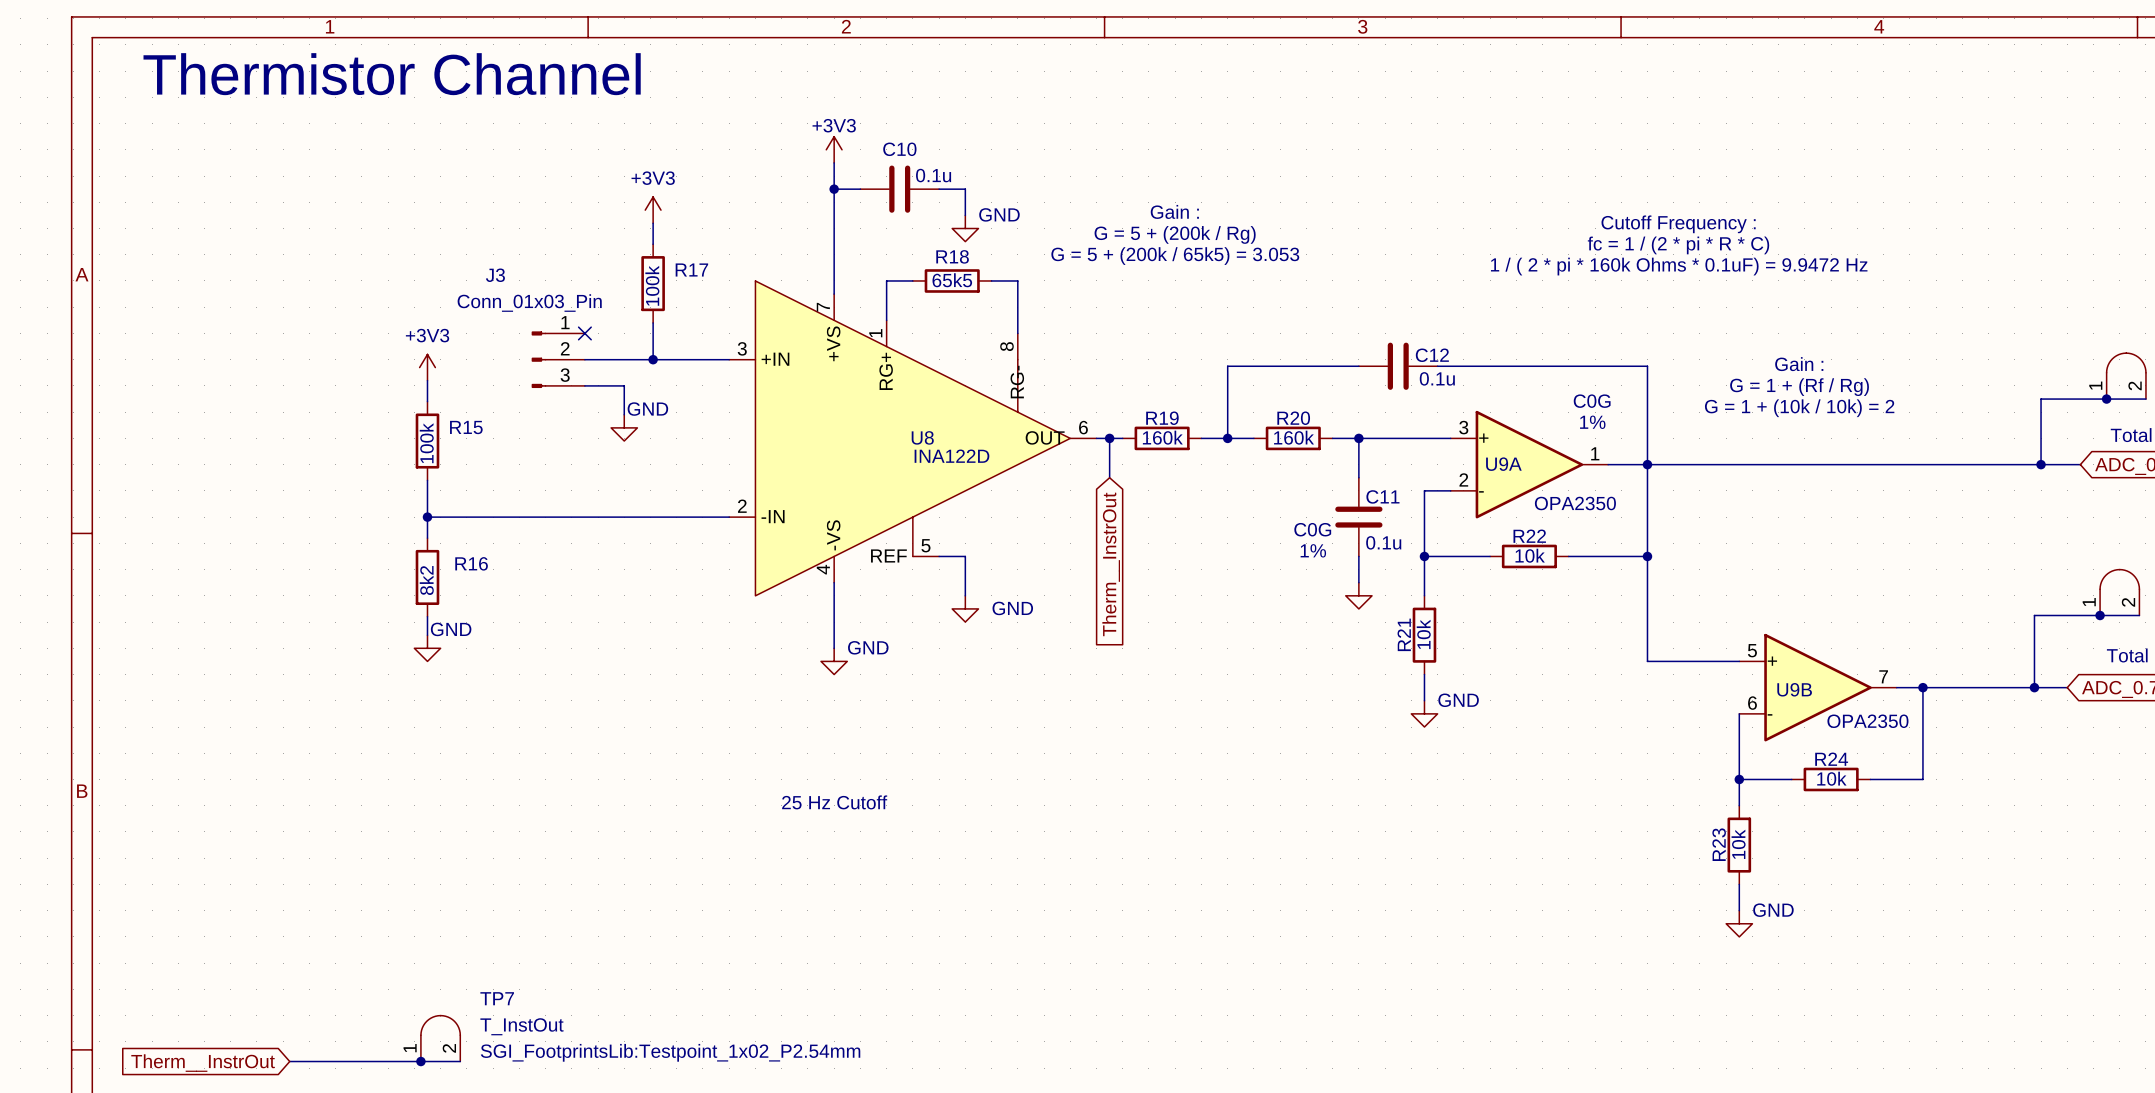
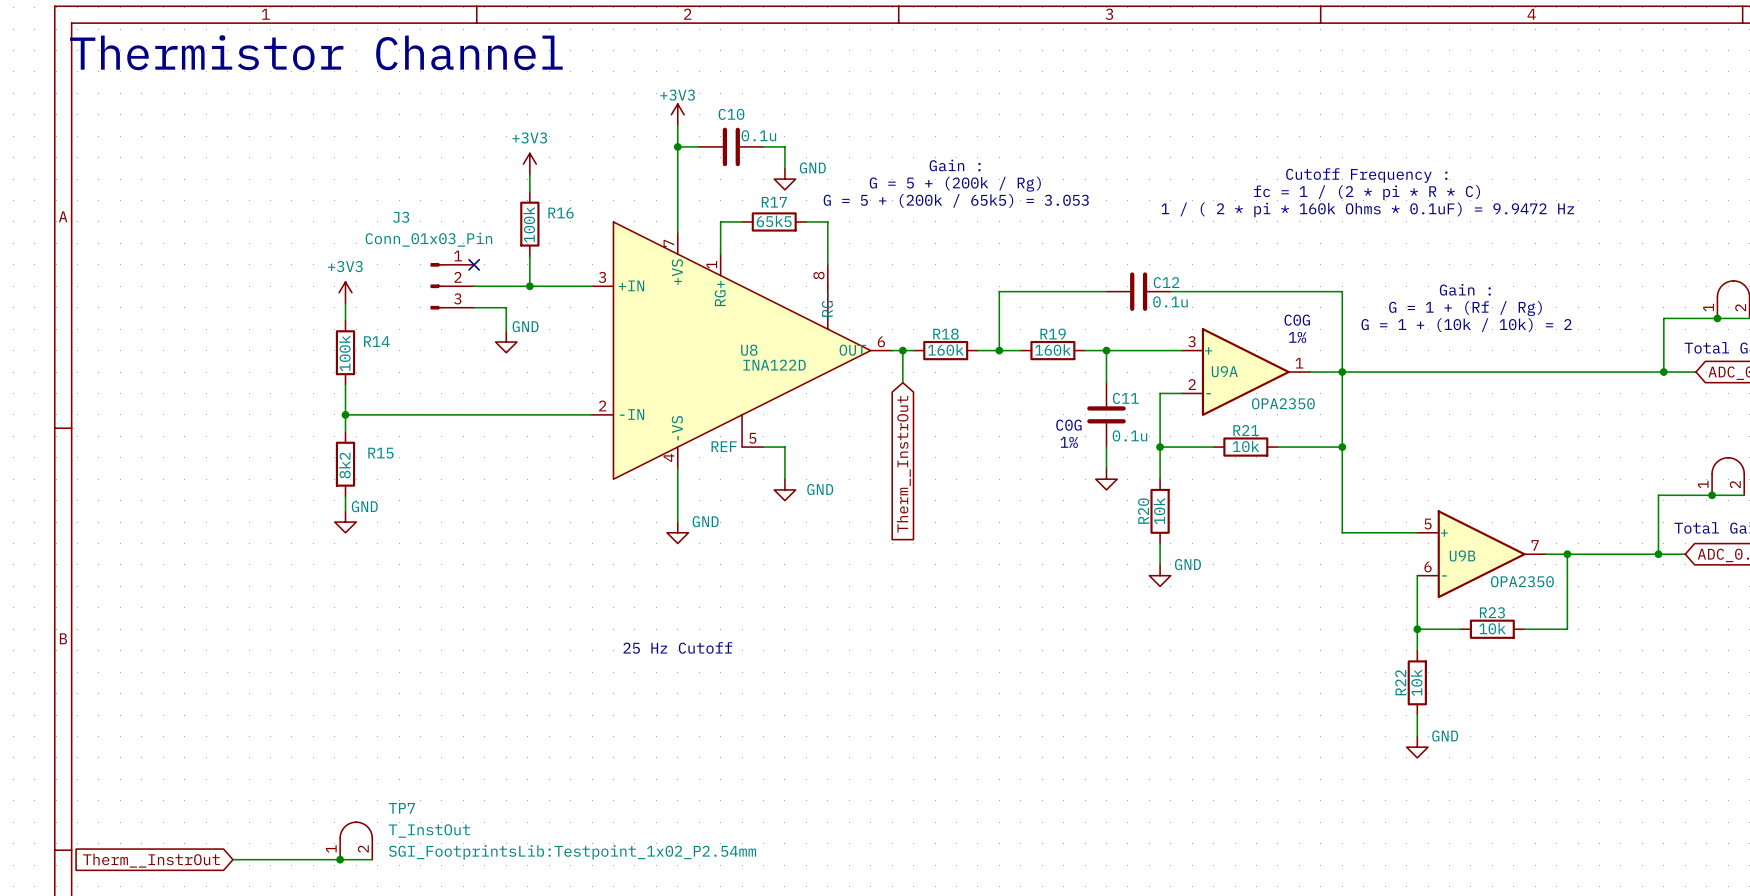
R18 name: R18 (952, 256) -> R17 (774, 202)
R17 name: R17 (691, 270) -> R16 (561, 213)
R19 name: R19 (1162, 418) -> R18 (945, 334)
R20 name: R20 (1293, 418) -> R19 (1053, 334)
R15 name: R15 (466, 427) -> R14 (376, 341)
R22 name: R22 (1529, 536) -> R21 (1246, 430)
R16 name: R16 (471, 563) -> R15 (380, 453)
R21 name: R21 (1404, 634) -> R20 (1143, 511)
R24 name: R24 (1831, 759) -> R23 (1492, 612)
R23 name: R23 (1719, 844) -> R22 (1400, 682)

